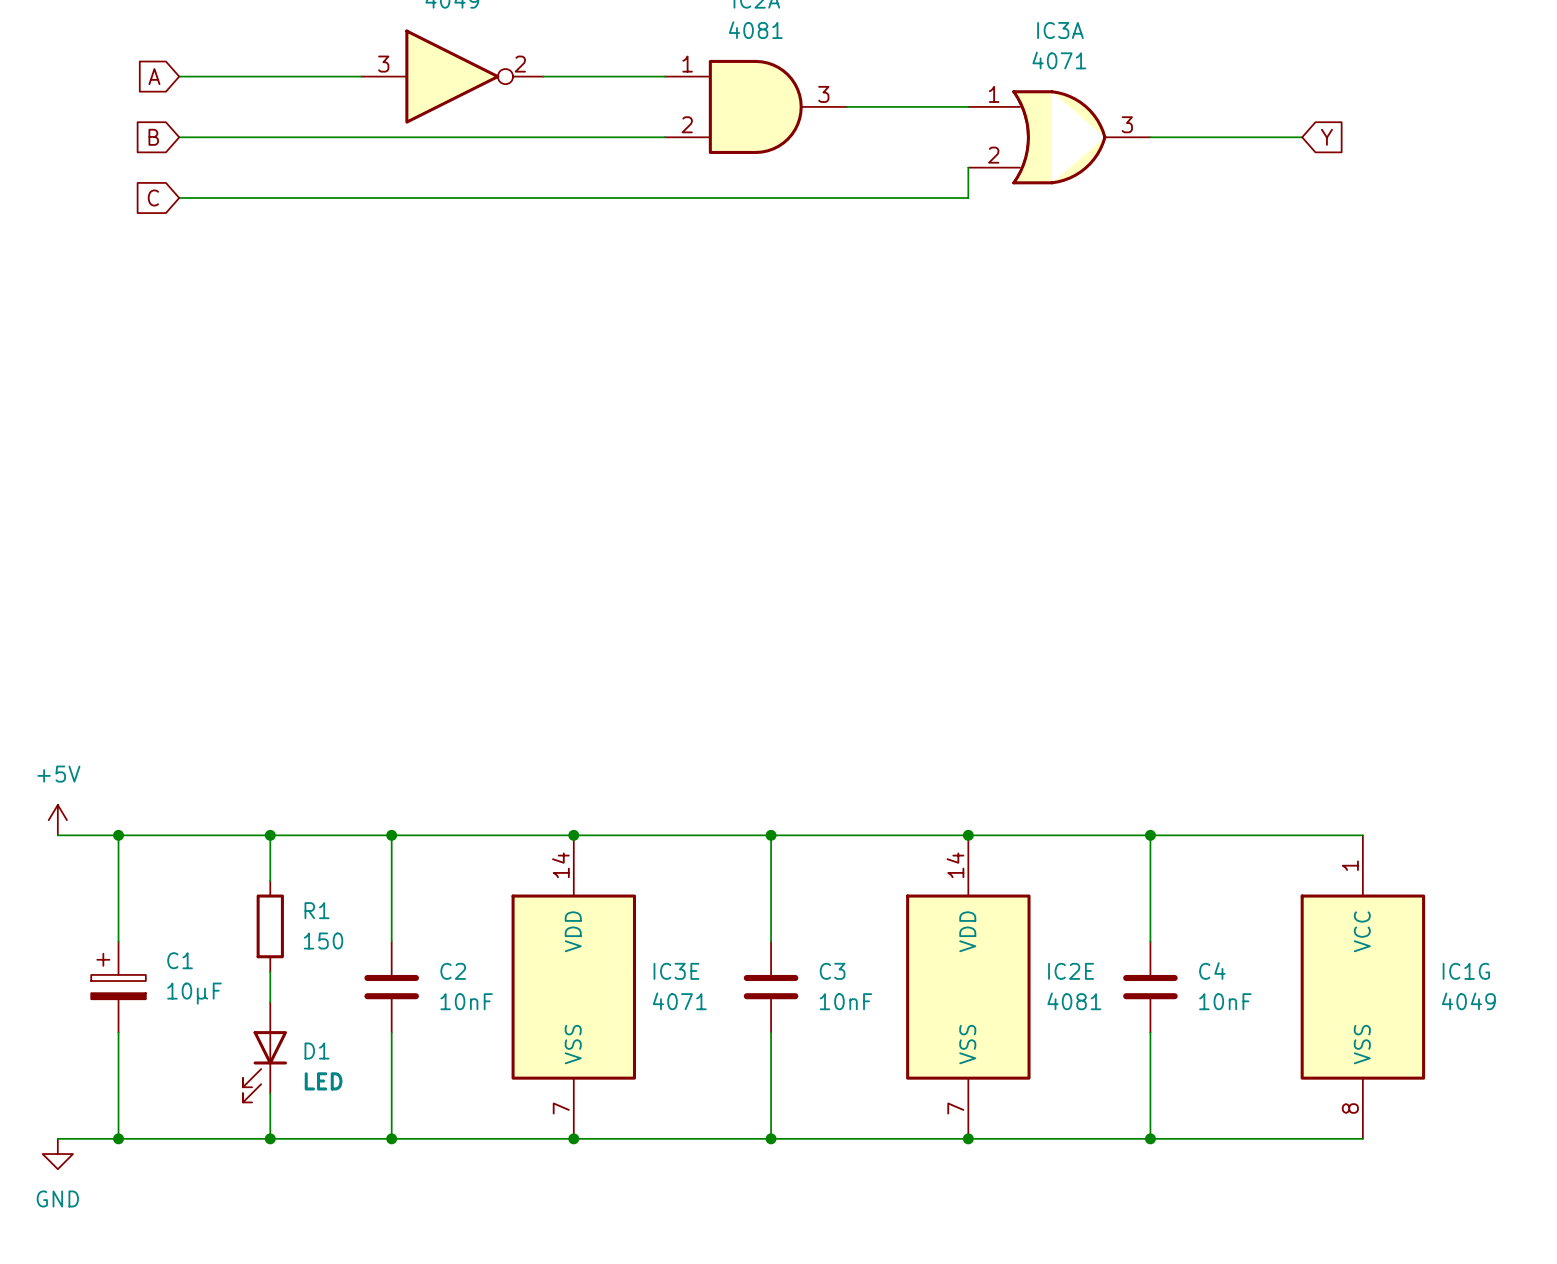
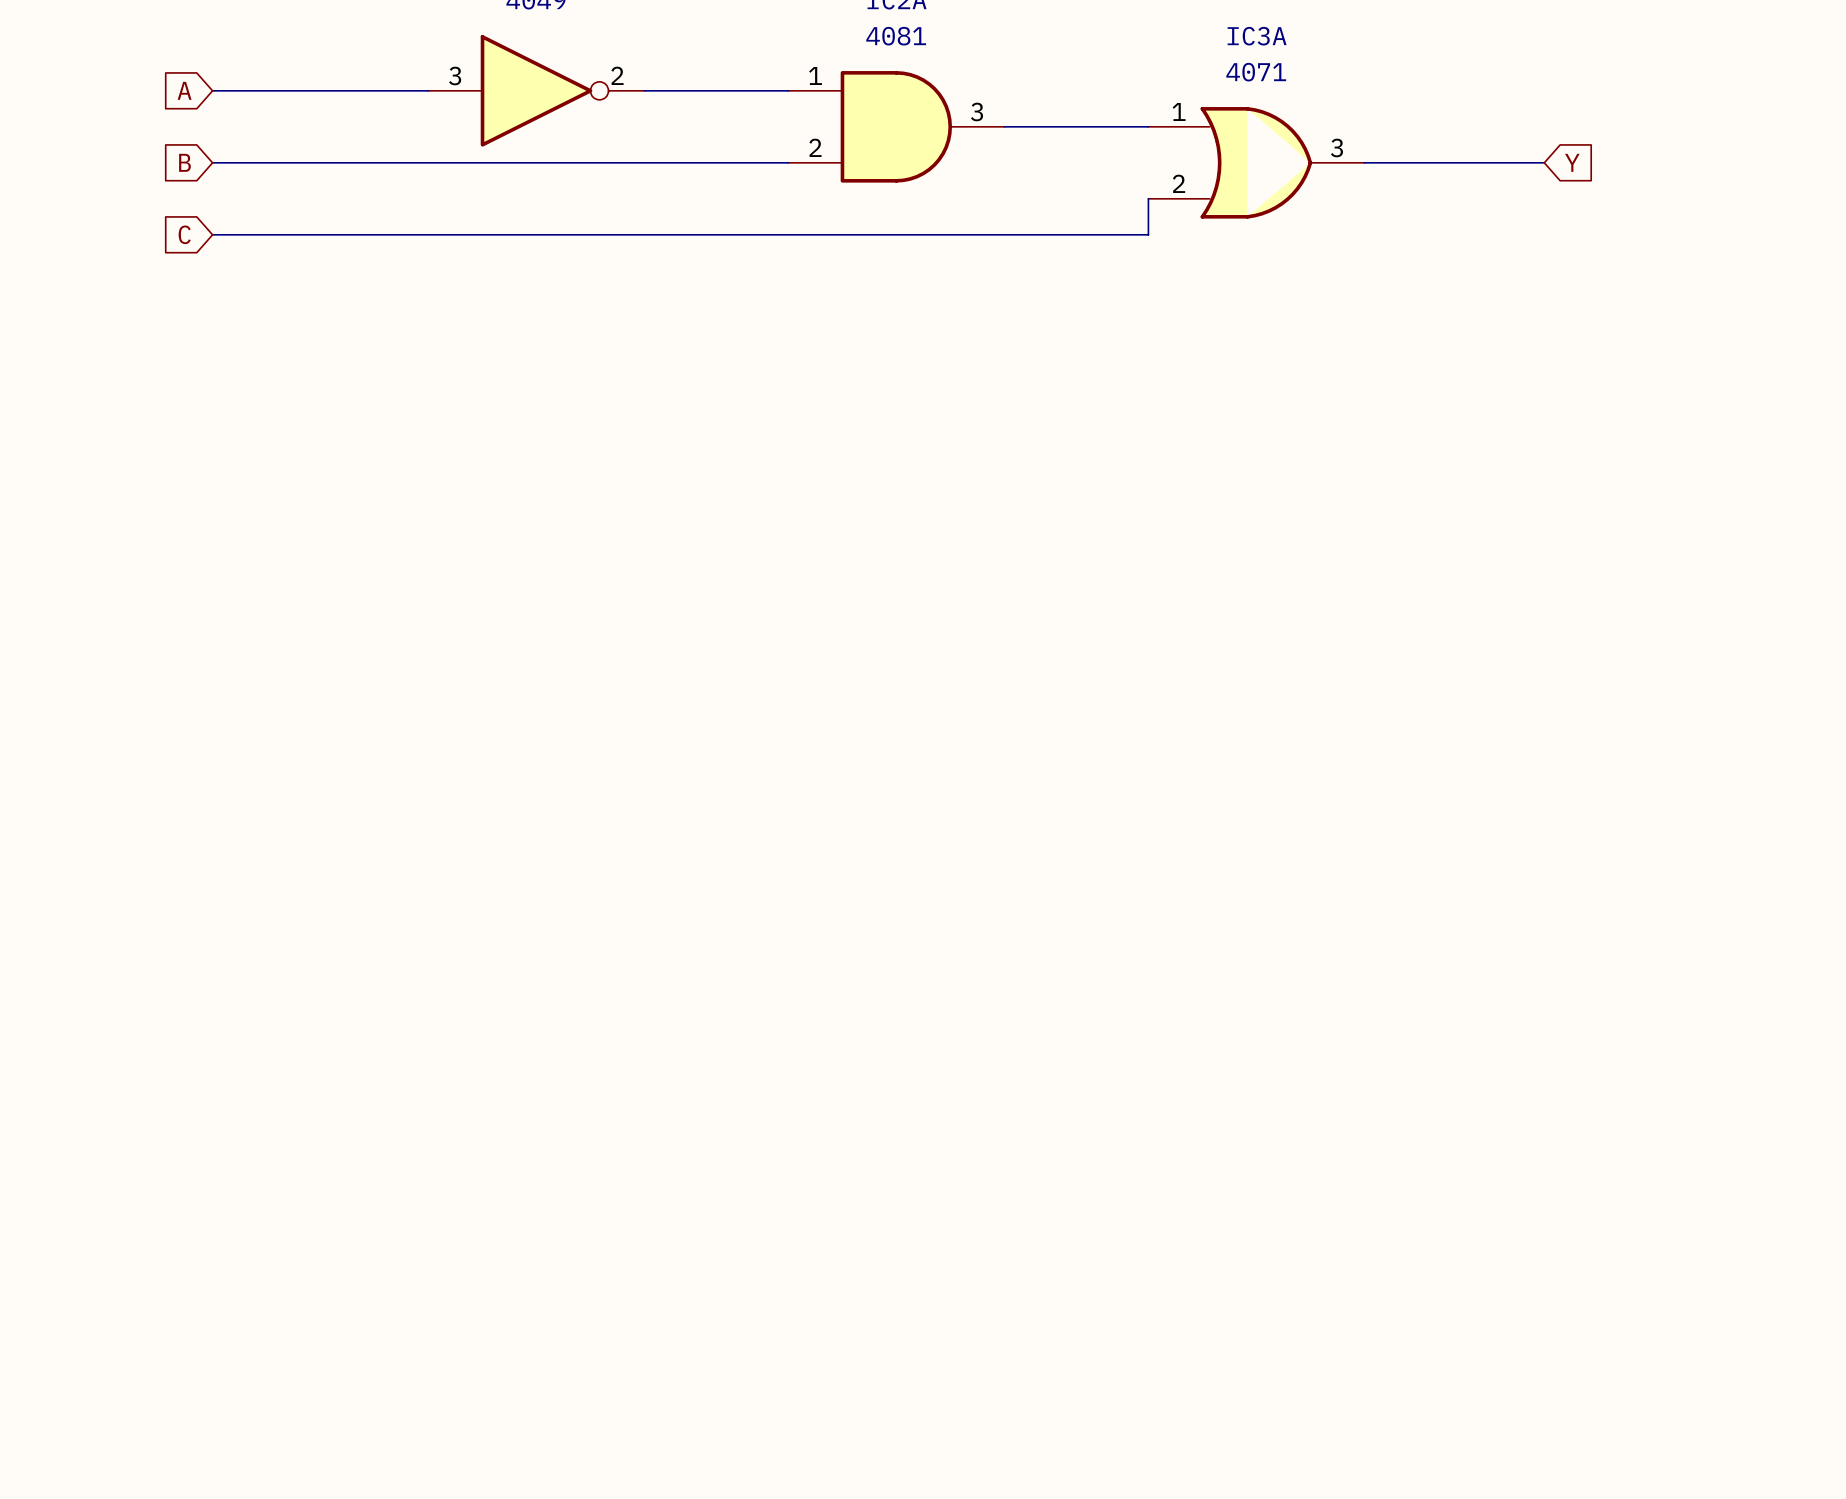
power symbol: +5V (57, 820) -> none
wire: (57, 835) (1362, 835) -> none
wire: (118, 835) (118, 941) -> none
junction: (118, 835) -> none
wire: (270, 835) (270, 880) -> none
junction: (270, 835) -> none
wire: (391, 835) (391, 941) -> none
junction: (391, 835) -> none
junction: (573, 835) -> none
wire: (771, 835) (771, 941) -> none
junction: (771, 835) -> none
junction: (968, 835) -> none
wire: (1150, 835) (1150, 941) -> none
junction: (1150, 835) -> none
R1: 150 (270, 926) -> none
wire: (270, 971) (270, 1002) -> none
C1: 10µF (118, 987) -> none
C2: 10nF (391, 987) -> none
IC3E: 4071 (573, 987) -> none
C3: 10nF (771, 987) -> none
IC2E: 4081 (968, 987) -> none
C4: 10nF (1150, 987) -> none
IC1G: 4049 (1362, 987) -> none
wire: (118, 1032) (118, 1138) -> none
wire: (391, 1032) (391, 1138) -> none
wire: (771, 1032) (771, 1138) -> none
wire: (1150, 1032) (1150, 1138) -> none
D1: LED (264, 1052) -> none
wire: (270, 1093) (270, 1138) -> none
wire: (57, 1138) (1362, 1138) -> none
junction: (118, 1138) -> none
junction: (270, 1138) -> none
junction: (391, 1138) -> none
junction: (573, 1138) -> none
junction: (771, 1138) -> none
junction: (968, 1138) -> none
junction: (1150, 1138) -> none
power symbol: GND (57, 1154) -> none

